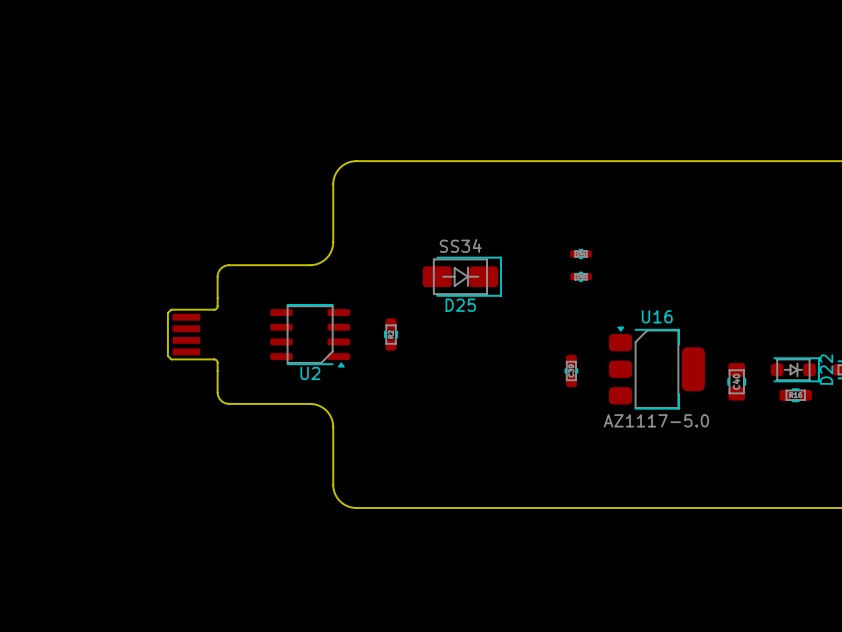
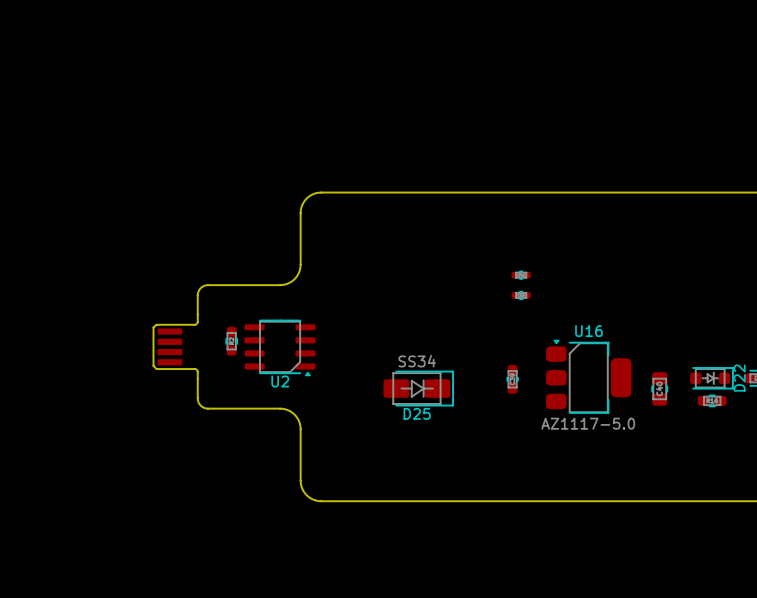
D25 position: (462, 276) -> (418, 388)
part position: (391, 334) -> (231, 341)

